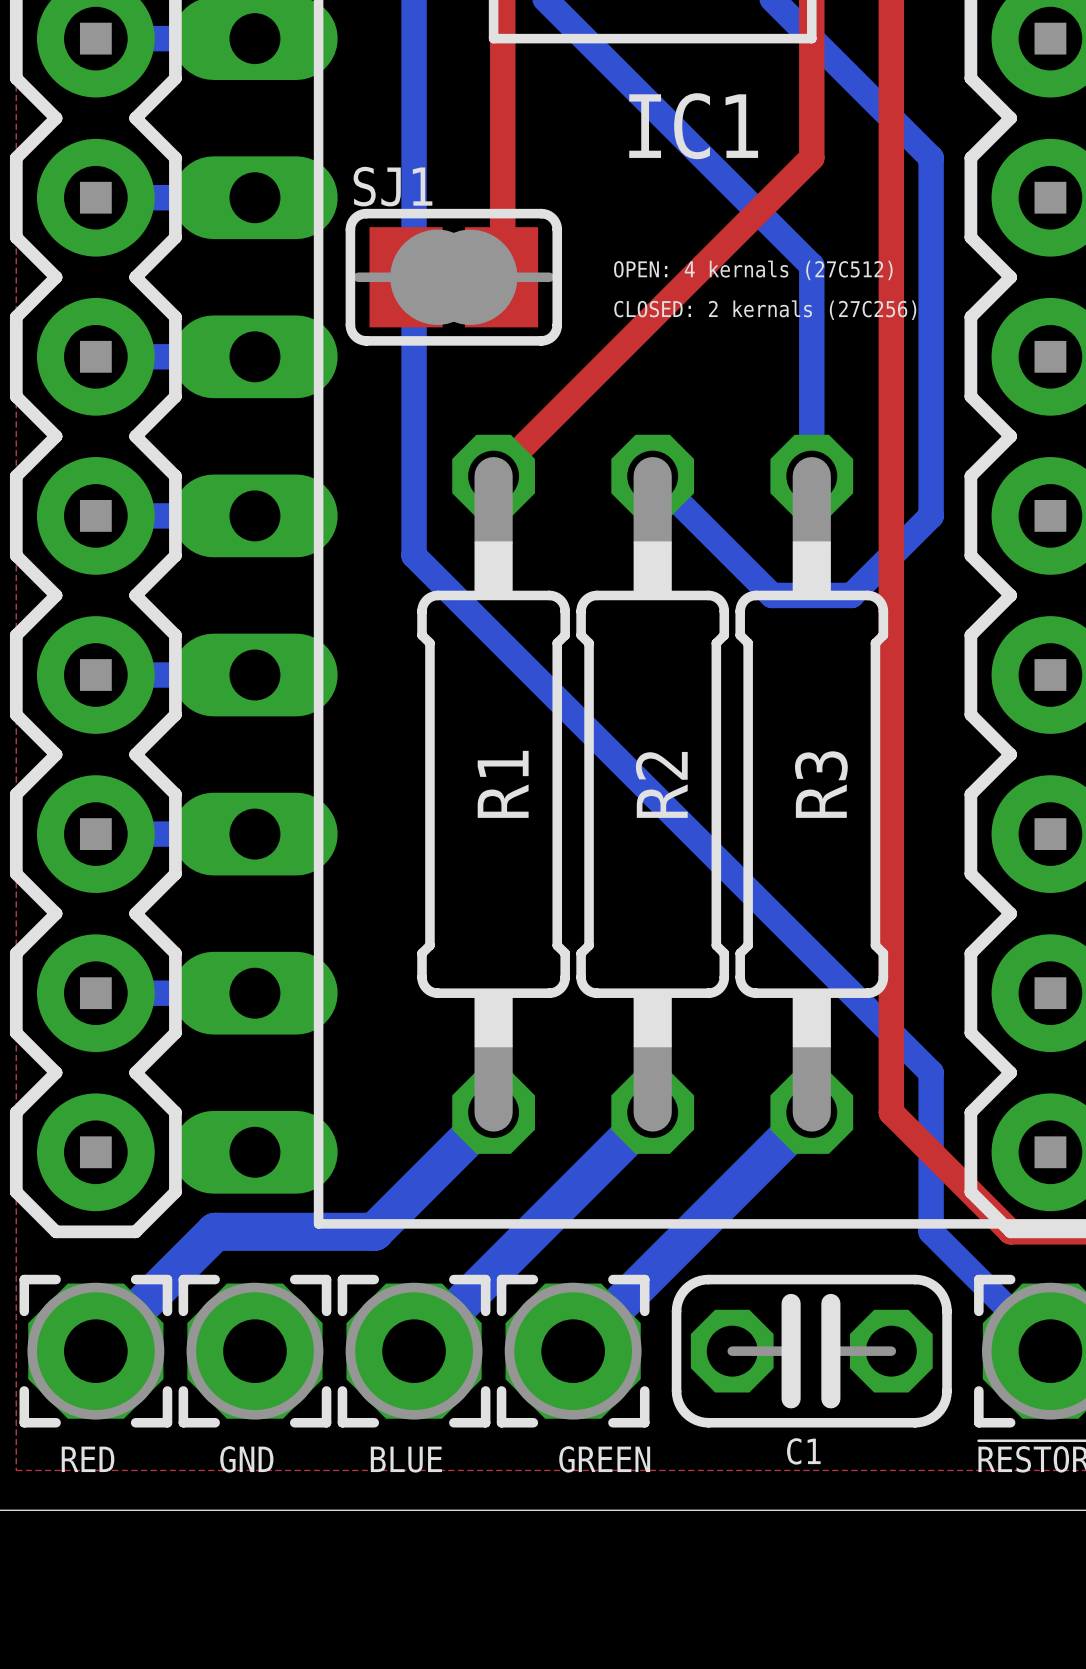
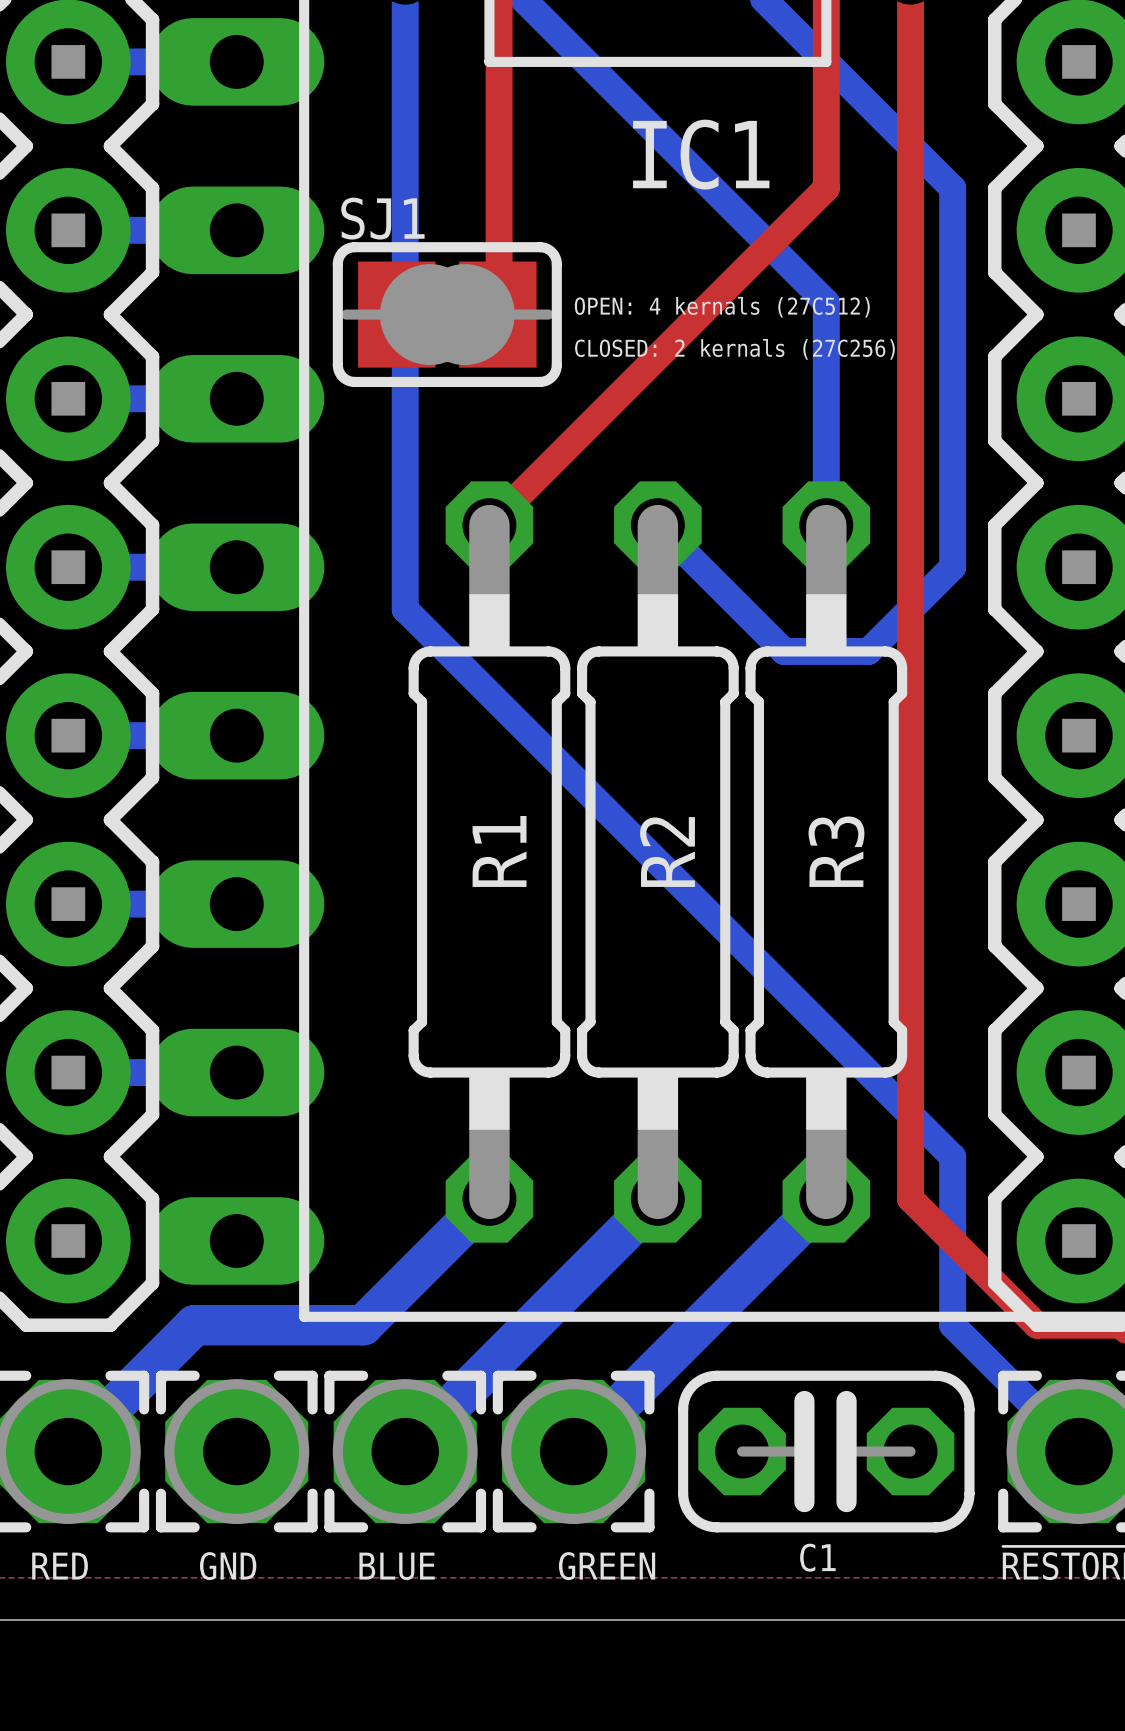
text position: OPEN: 4 kernals (27C512) (753, 270) -> OPEN: 4 kernals (27C512) (722, 307)
text position: CLOSED: 2 kernals (27C256) (765, 310) -> CLOSED: 2 kernals (27C256) (734, 349)

